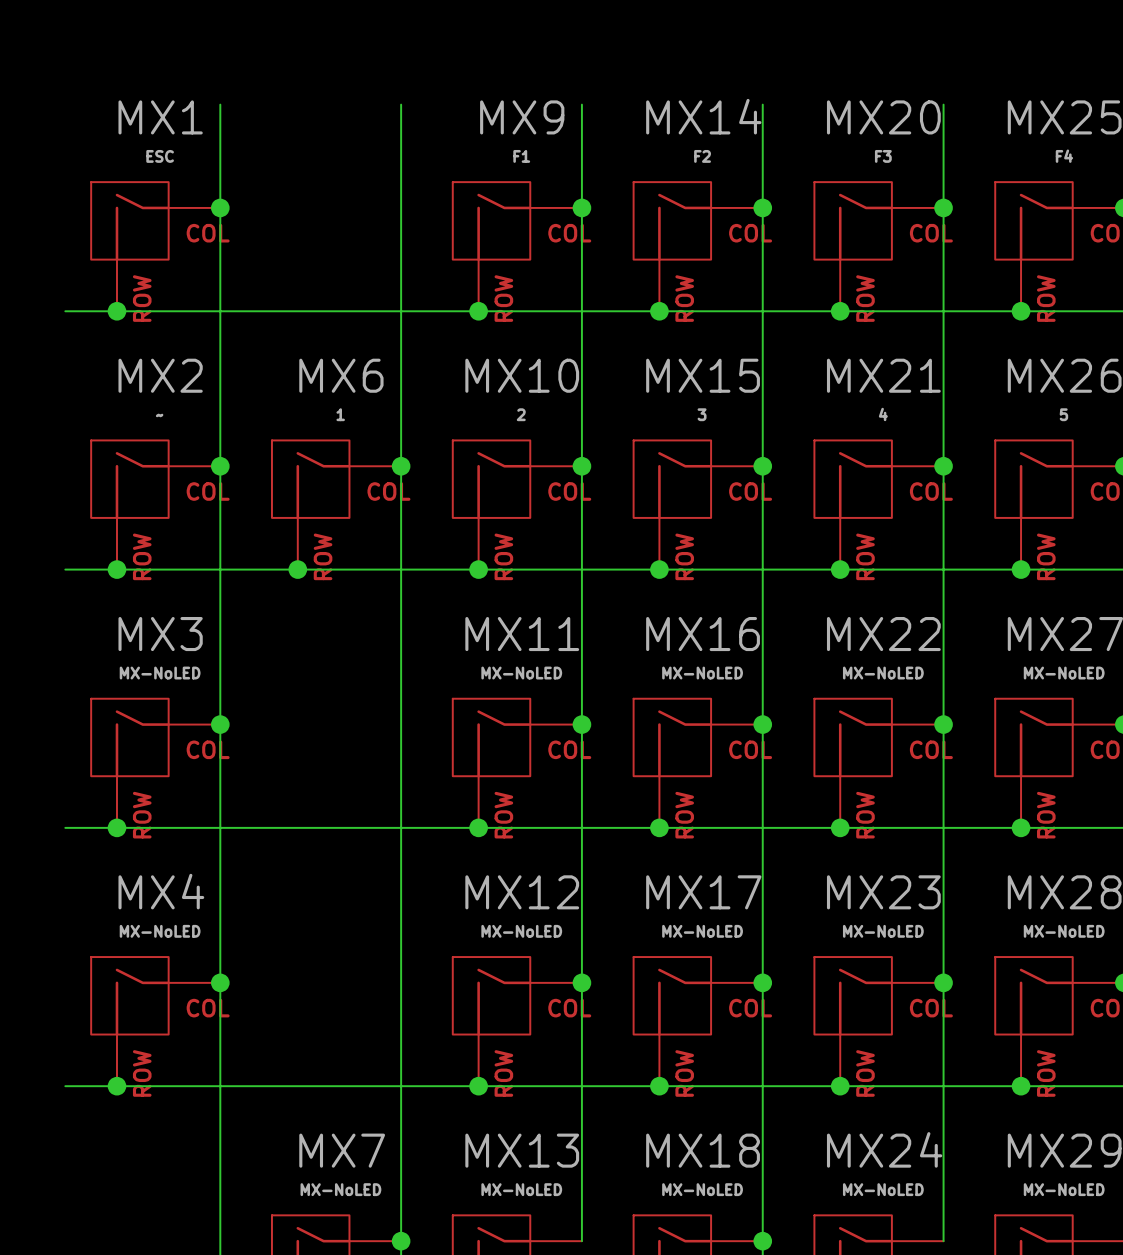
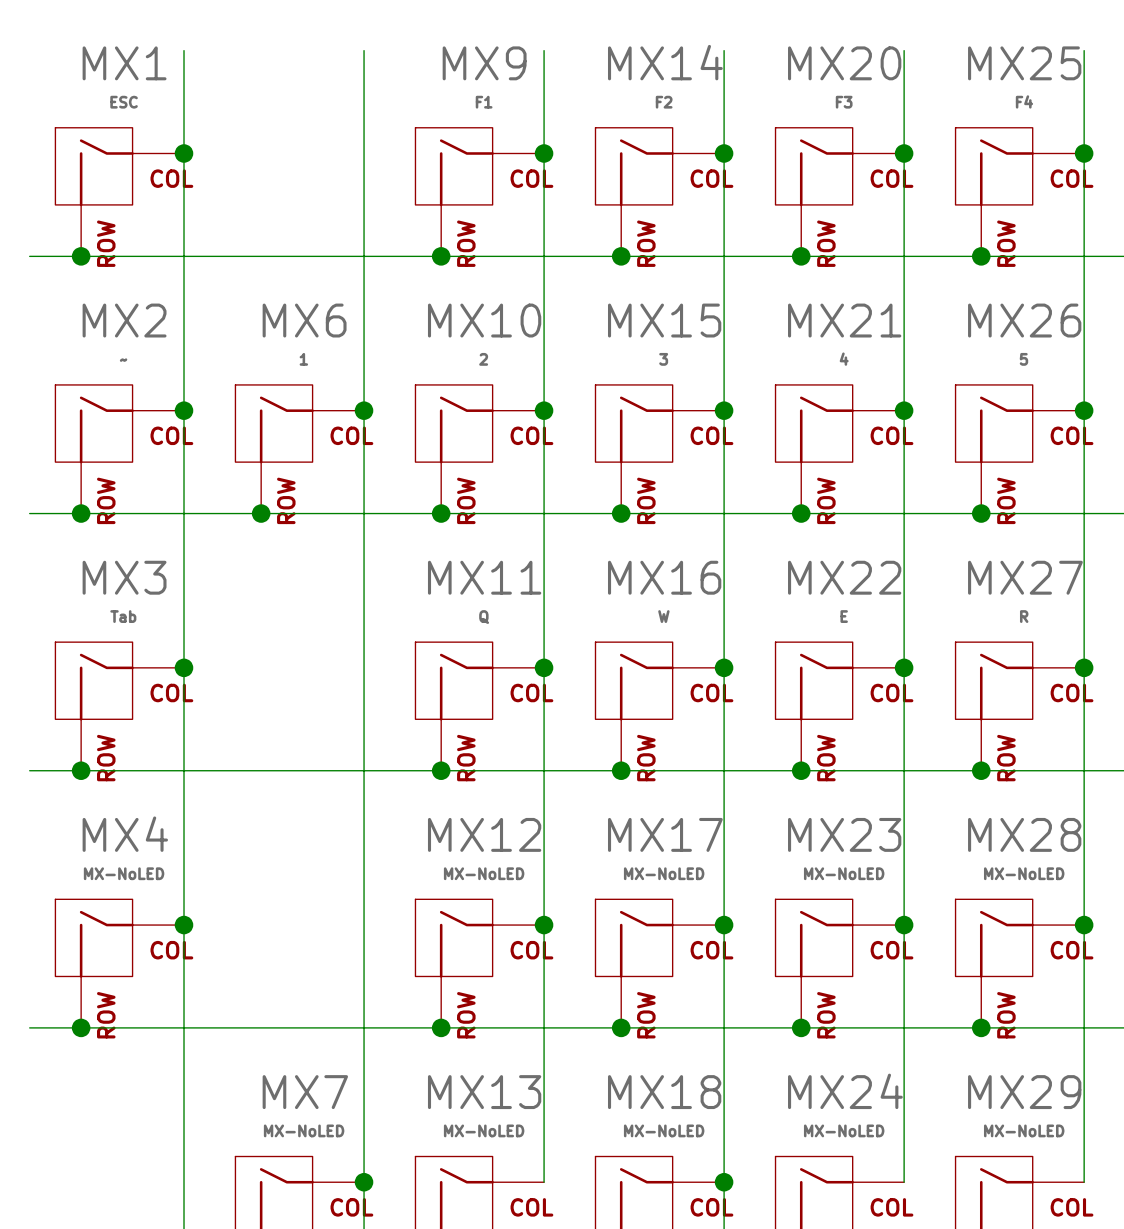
MX3 value: MX-NoLED (160, 673) -> Tab (123, 616)
MX11 value: MX-NoLED (521, 673) -> Q (484, 617)
MX16 value: MX-NoLED (702, 673) -> W (663, 616)
MX22 value: MX-NoLED (883, 673) -> E (844, 616)
MX27 value: MX-NoLED (1064, 673) -> R (1024, 616)

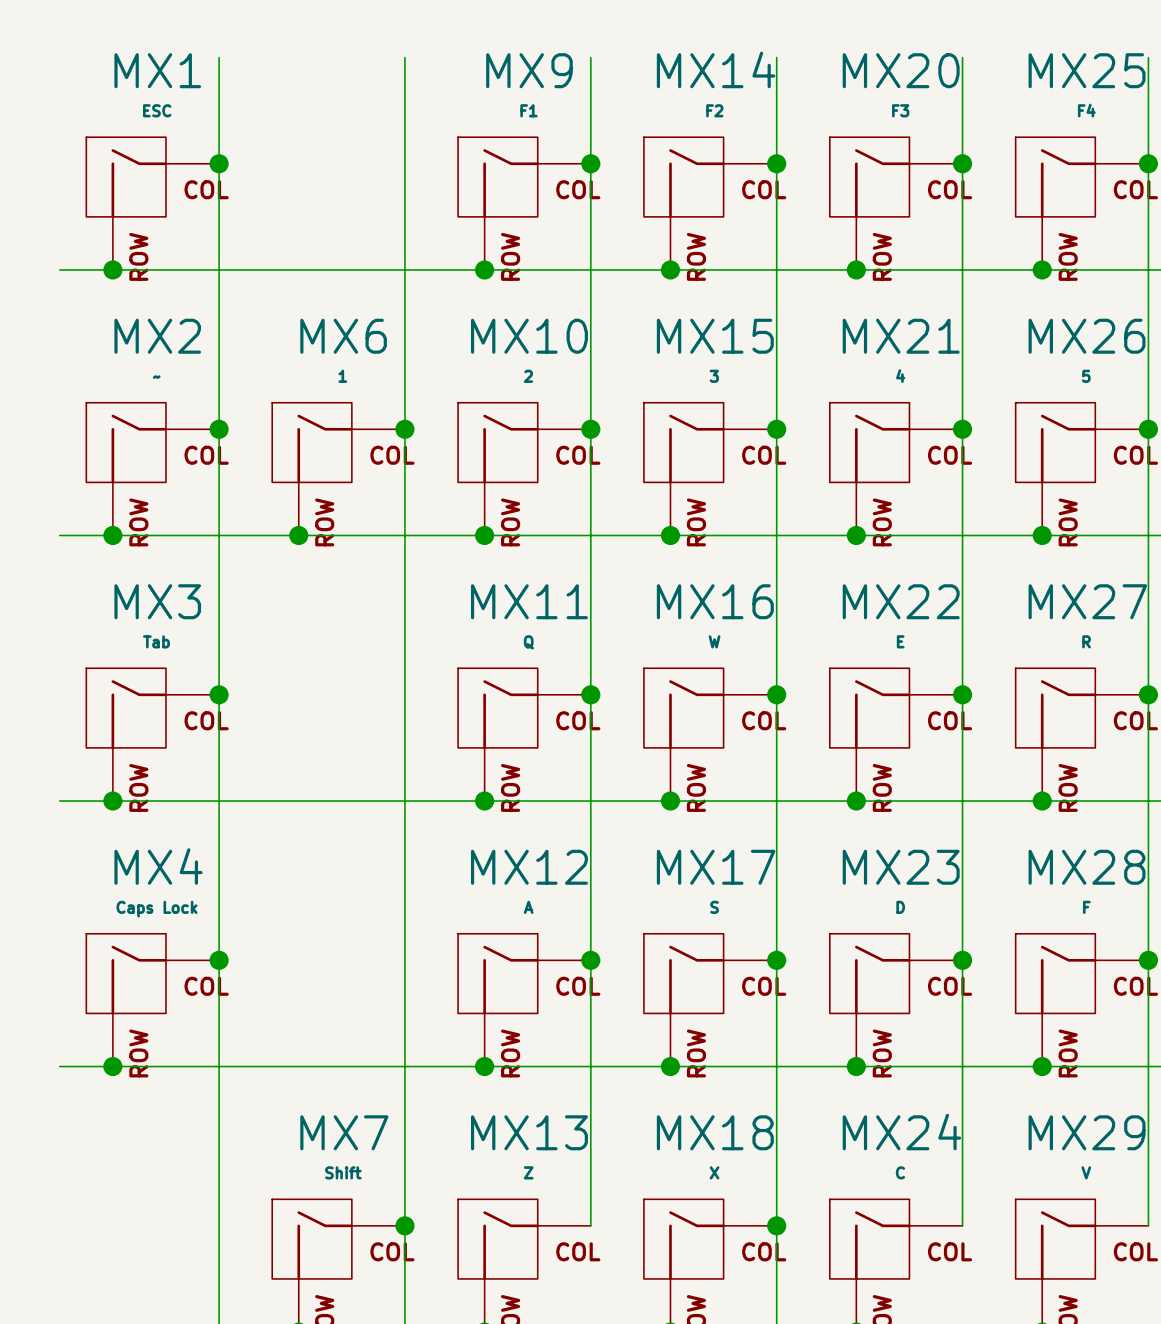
MX4 value: MX-NoLED (124, 873) -> Caps Lock (156, 909)
MX12 value: MX-NoLED (484, 873) -> A (528, 907)
MX17 value: MX-NoLED (664, 873) -> S (714, 907)
MX23 value: MX-NoLED (844, 873) -> D (900, 907)
MX28 value: MX-NoLED (1024, 873) -> F (1086, 907)
MX7 value: MX-NoLED (304, 1130) -> Shift (343, 1172)
MX13 value: MX-NoLED (484, 1130) -> Z (528, 1172)
MX18 value: MX-NoLED (664, 1130) -> X (714, 1172)
MX24 value: MX-NoLED (844, 1130) -> C (900, 1172)
MX29 value: MX-NoLED (1024, 1130) -> V (1086, 1172)

